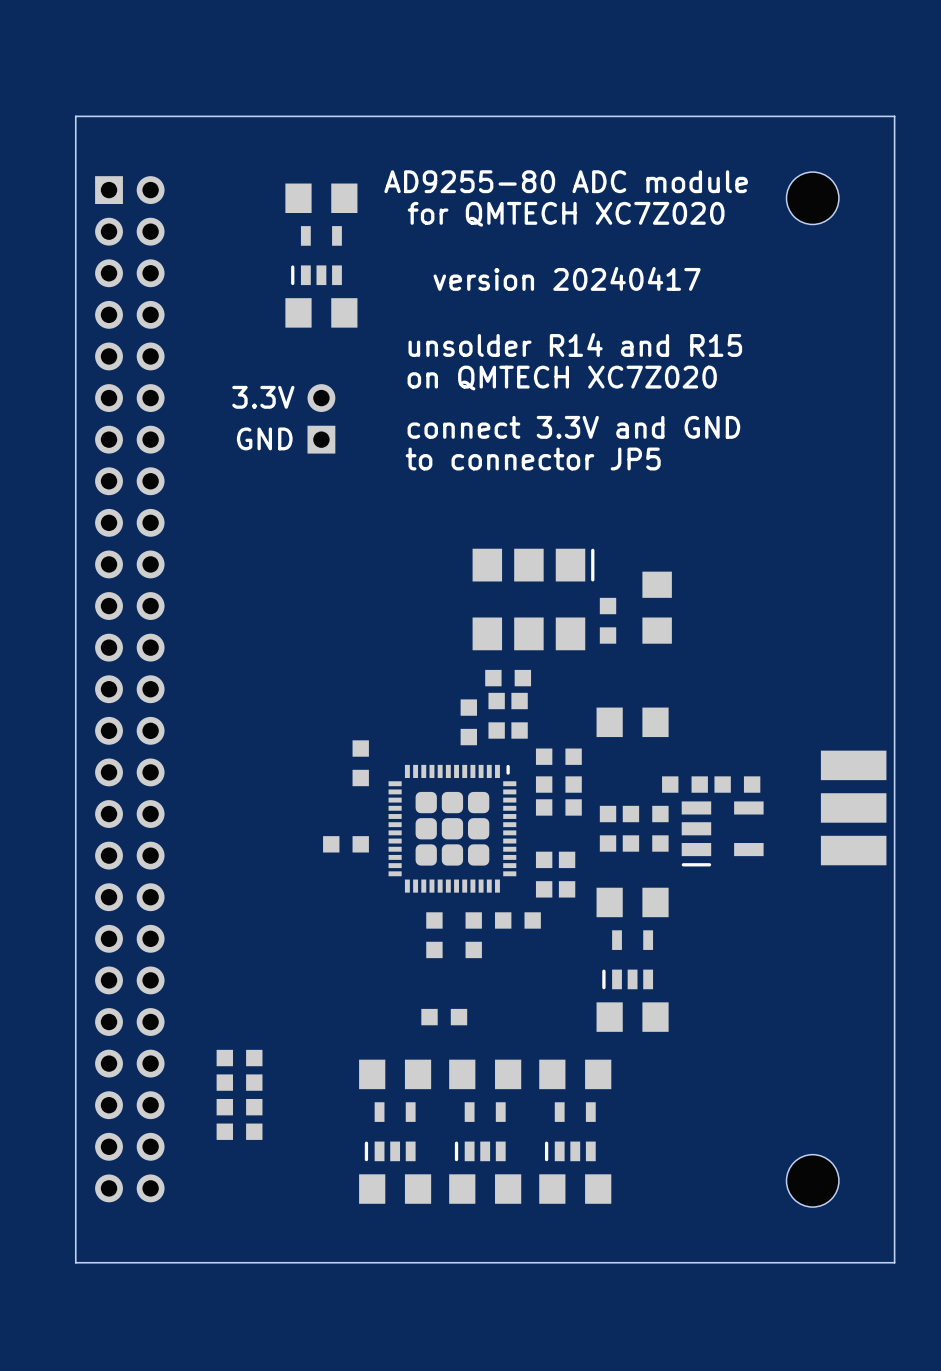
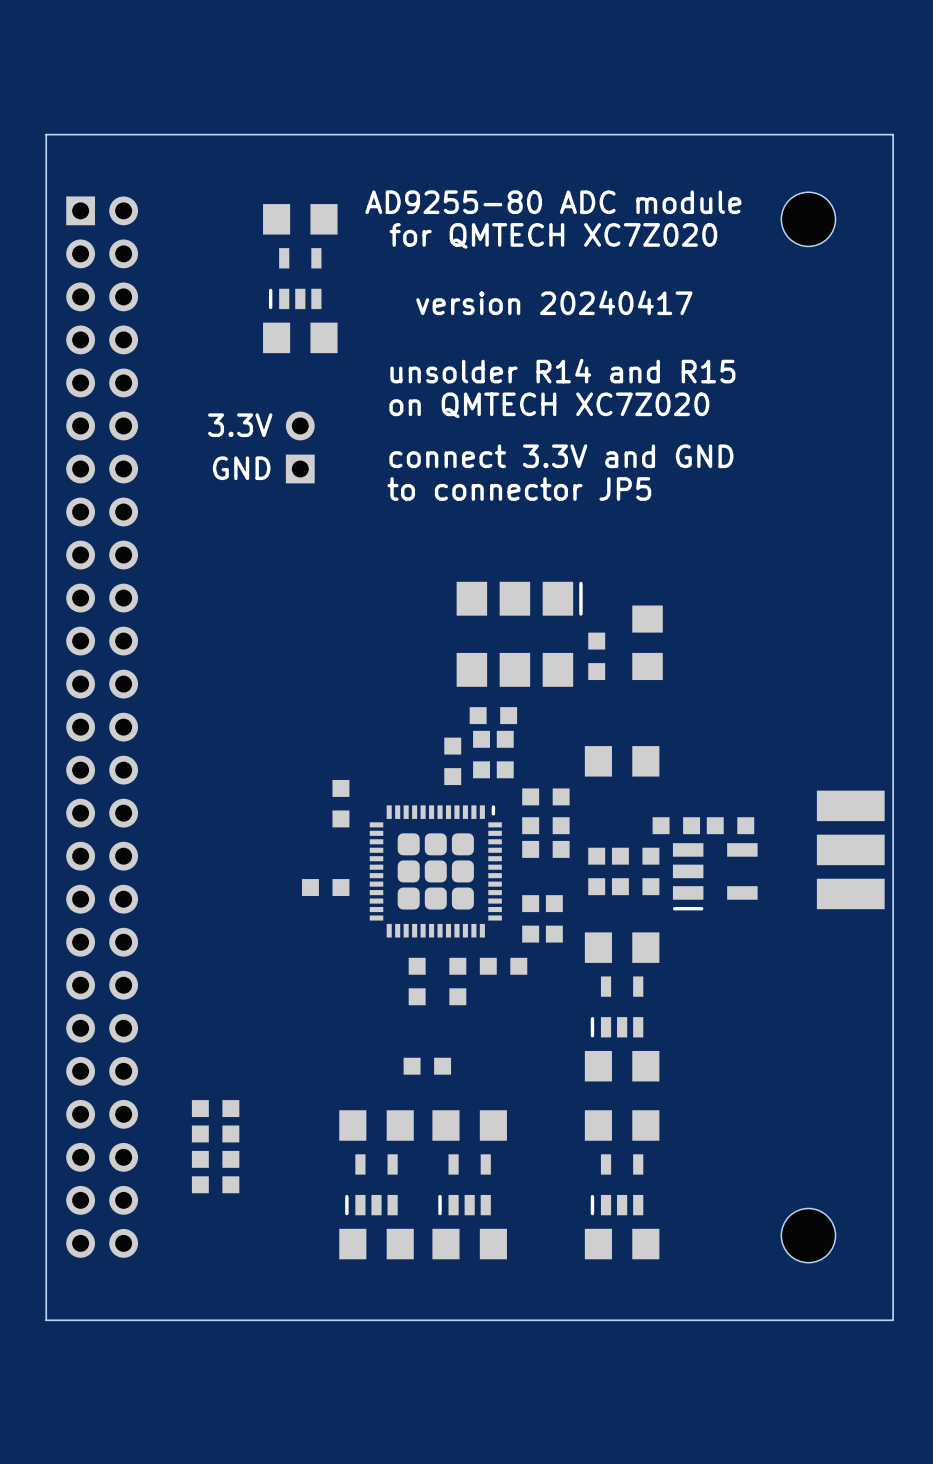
part position: (575, 1074) -> (622, 1125)
part position: (570, 1131) -> (617, 1184)
part position: (575, 1189) -> (622, 1244)

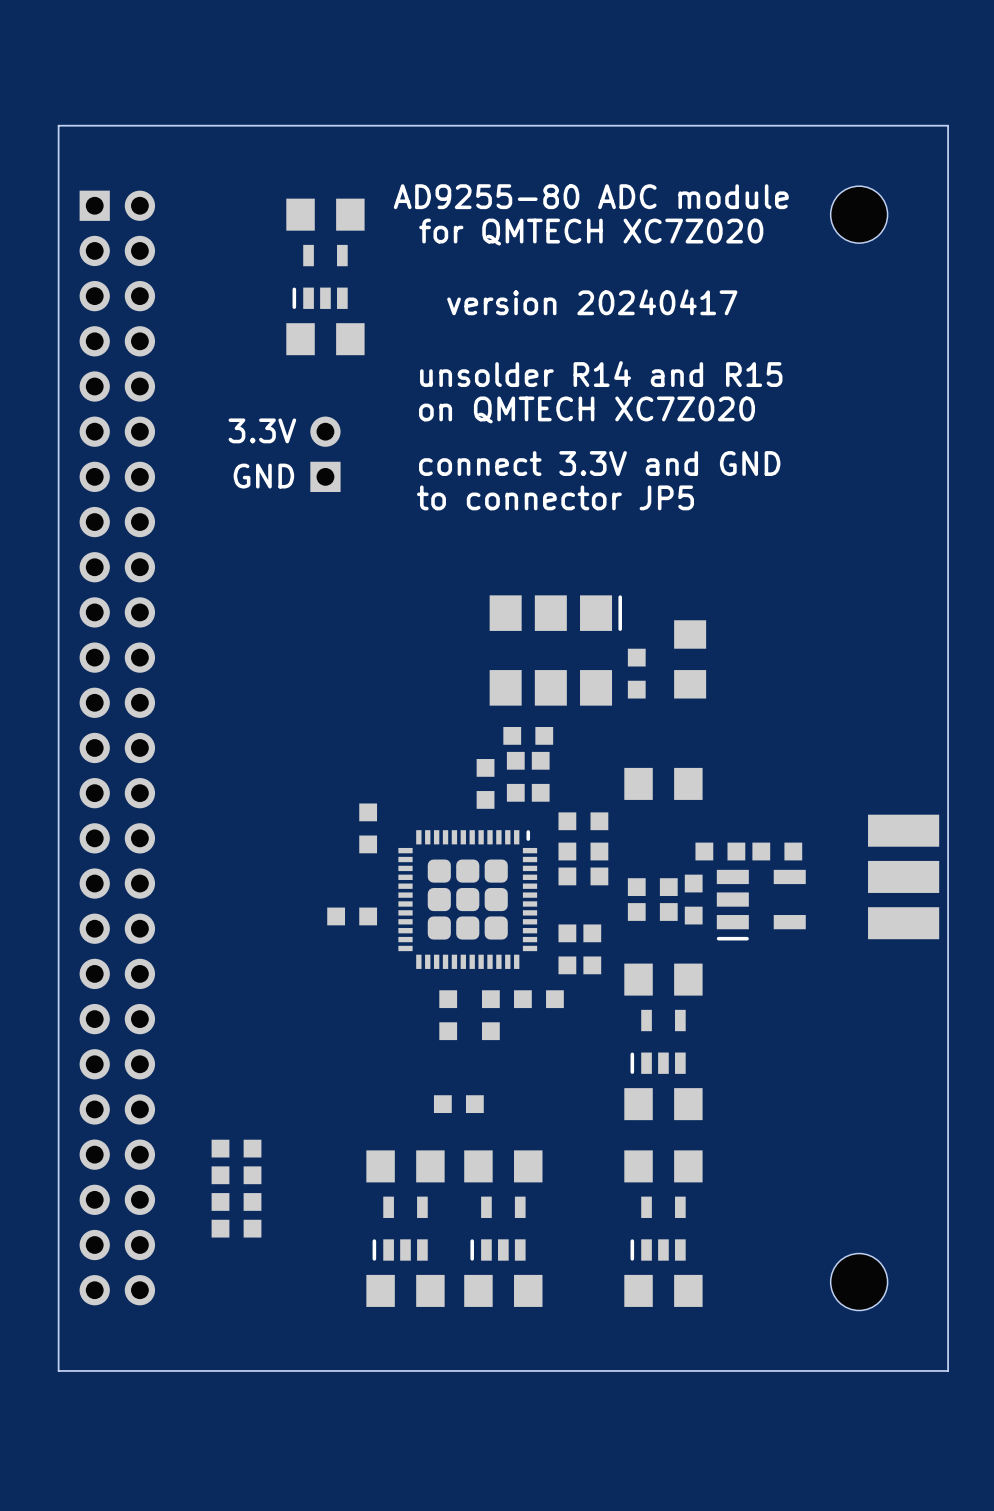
part: (635, 856) -> none
part: none -> (652, 887)
part: (596, 871) -> none
part: none -> (652, 912)
part: (635, 886) -> none

